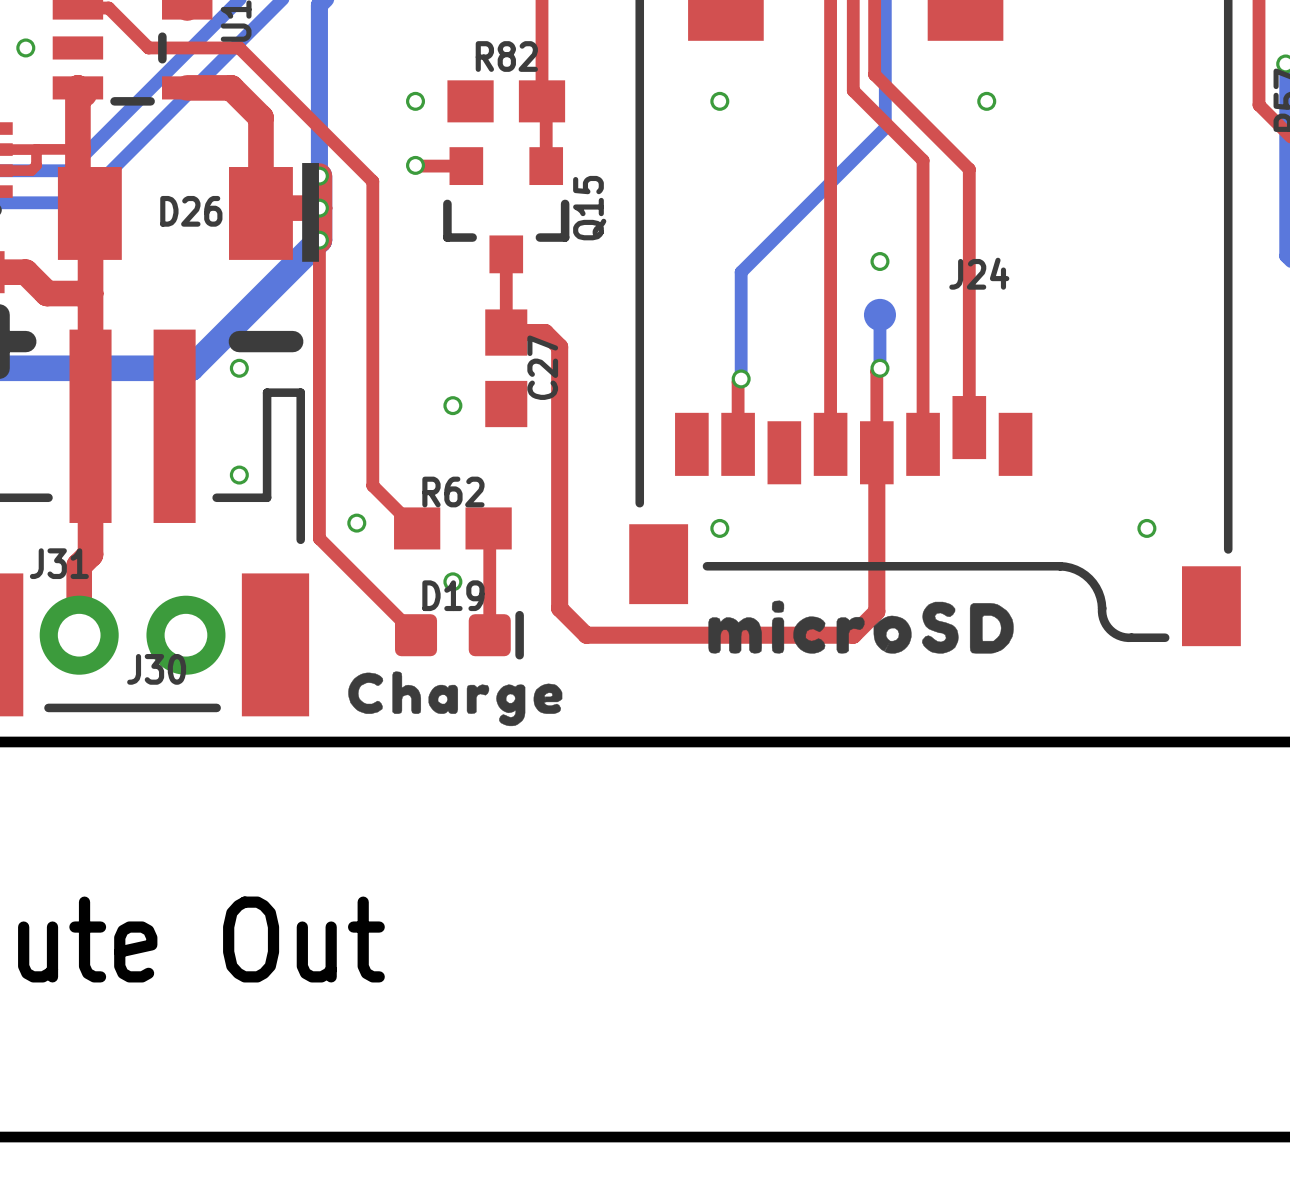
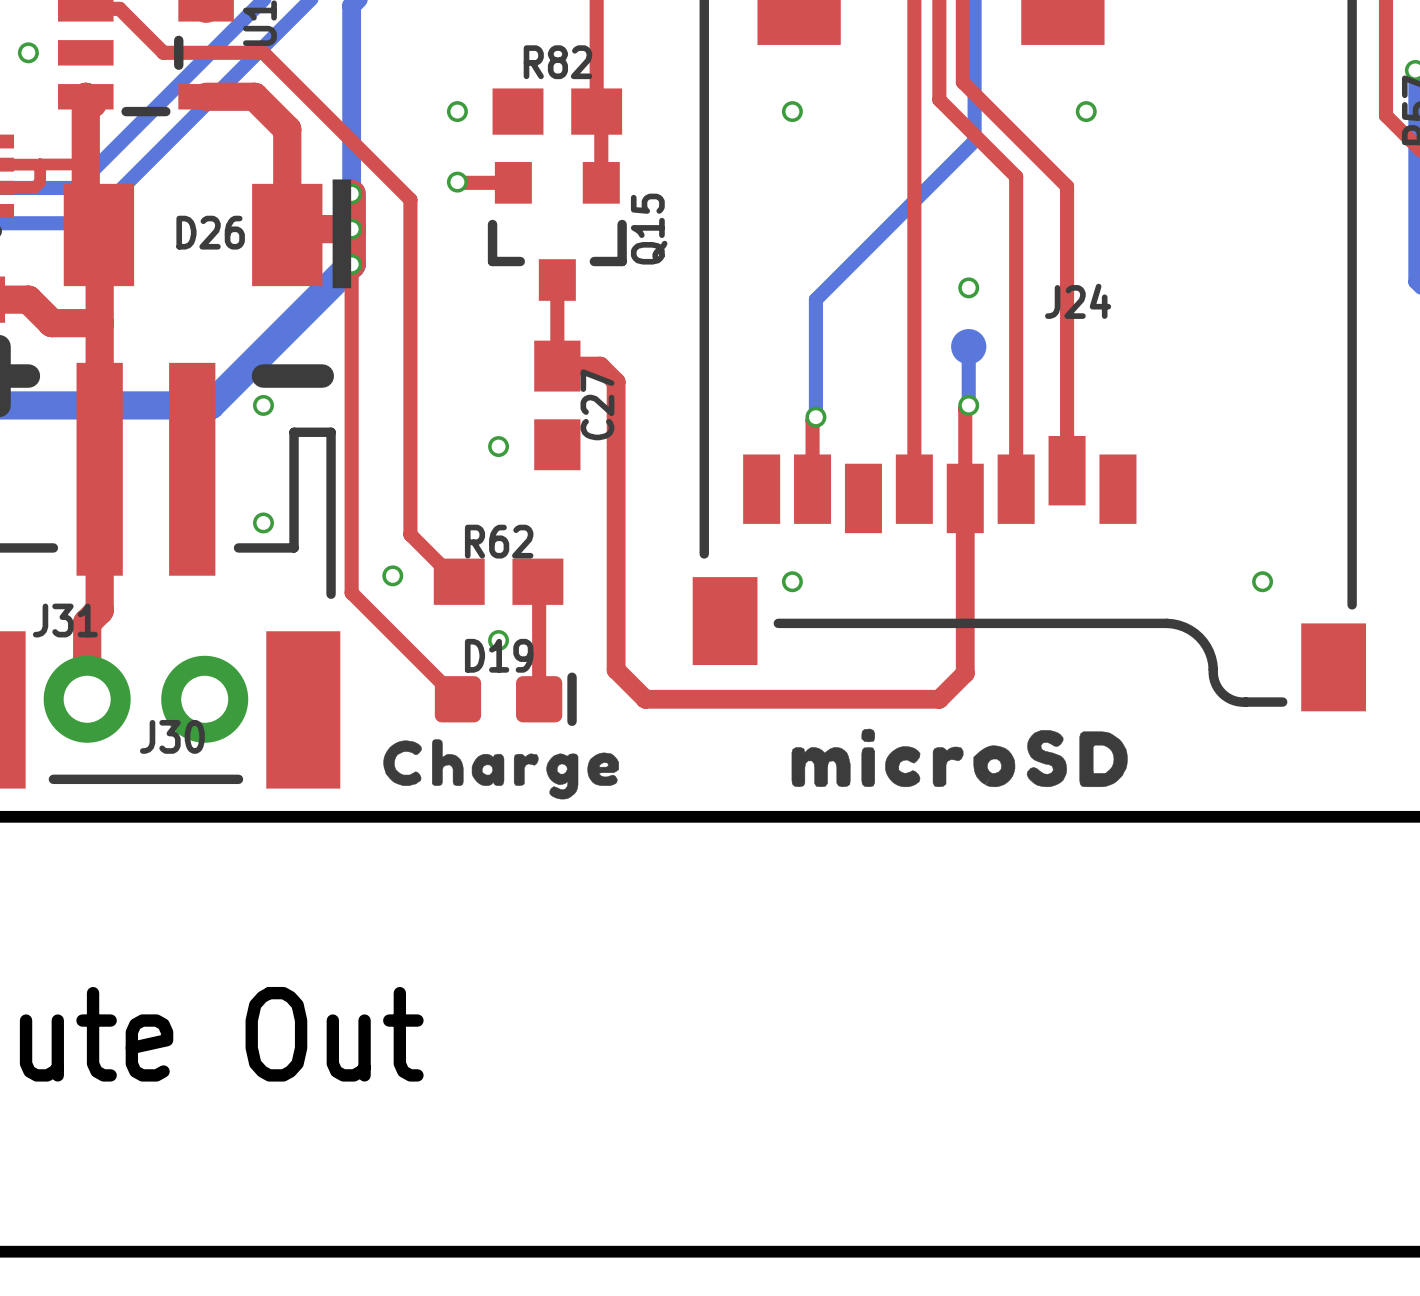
drawing position: (861, 627) -> (959, 757)

